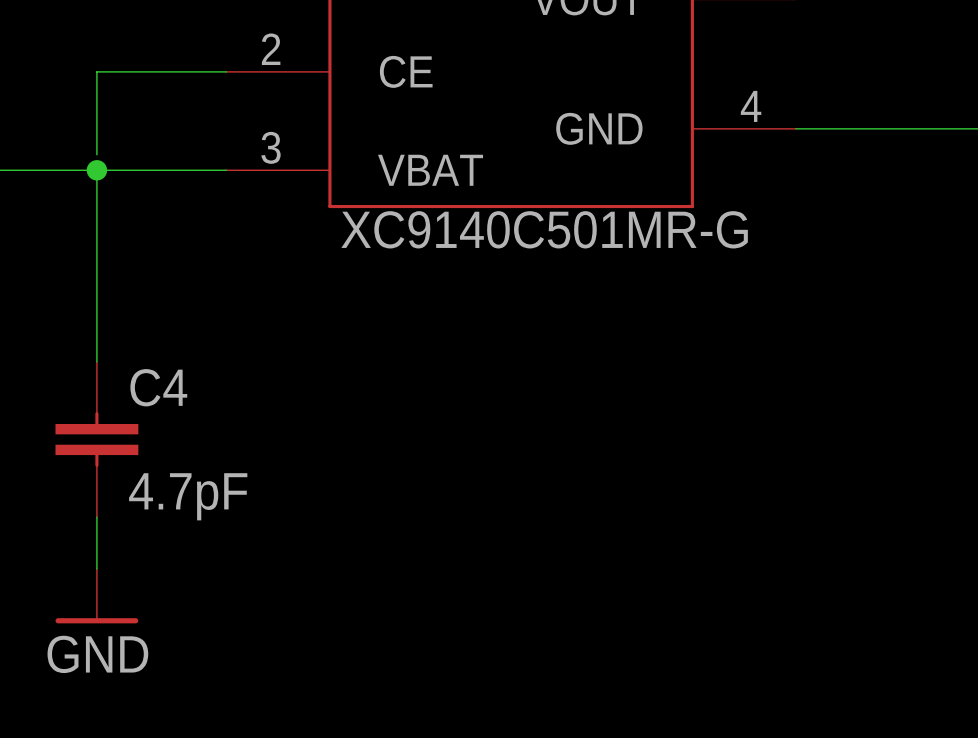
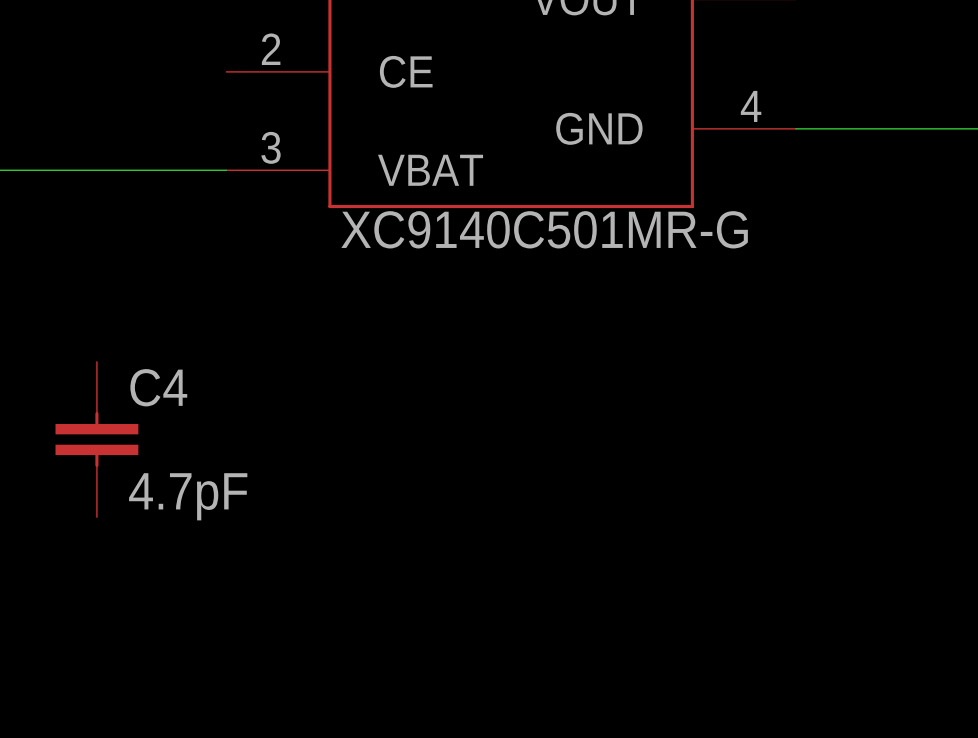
wire: (226, 71) (96, 71) (96, 154) -> none
wire: (96, 170) (96, 361) -> none
junction: (96, 170) -> none
wire: (96, 517) (96, 568) -> none
power symbol: GND (96, 596) -> none

